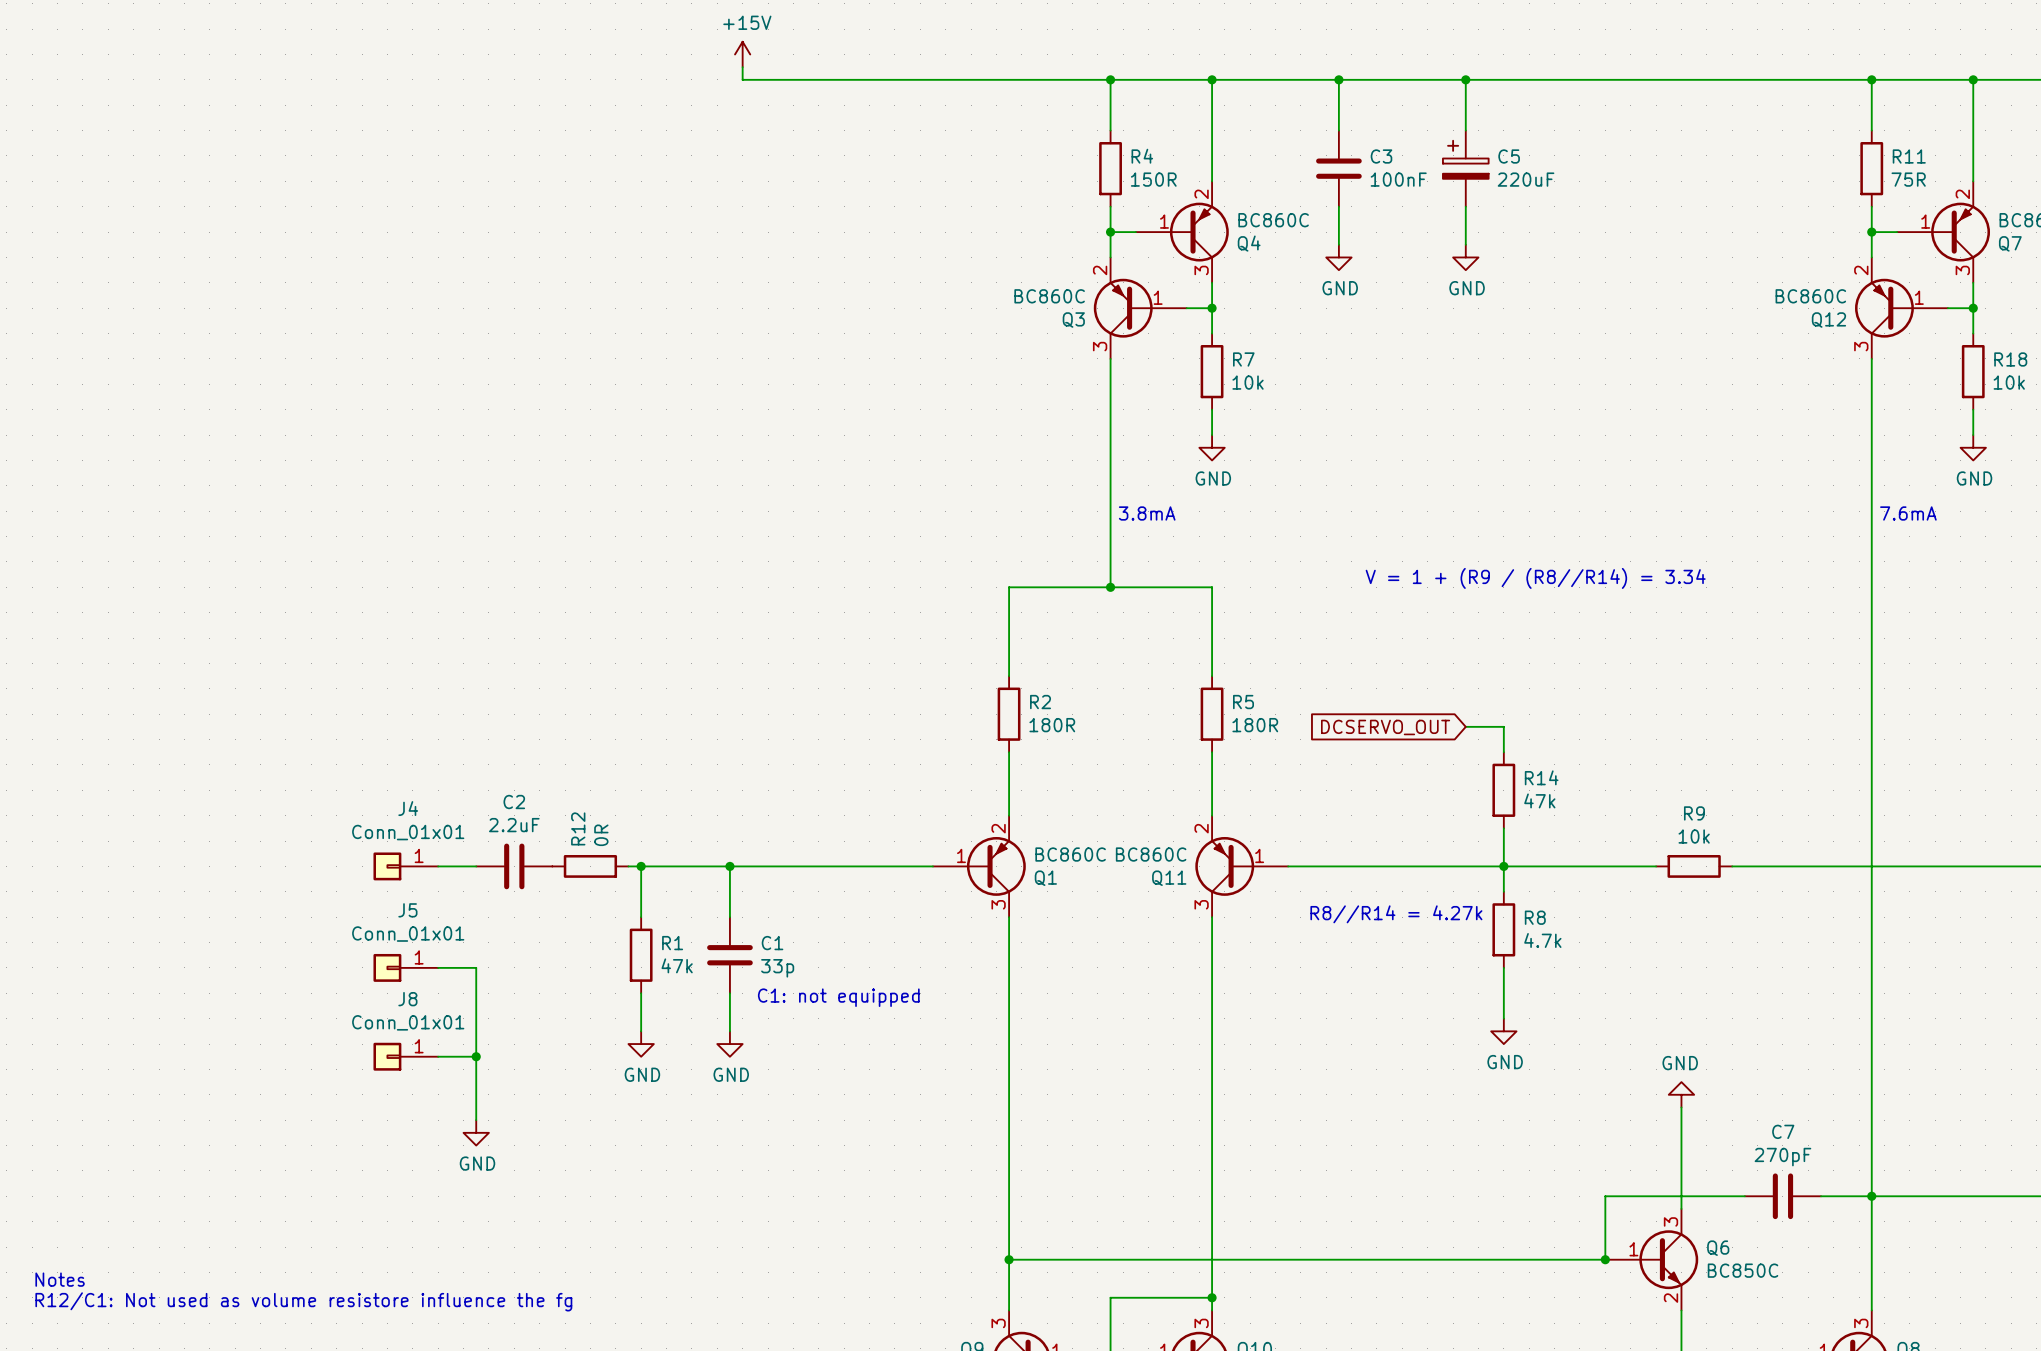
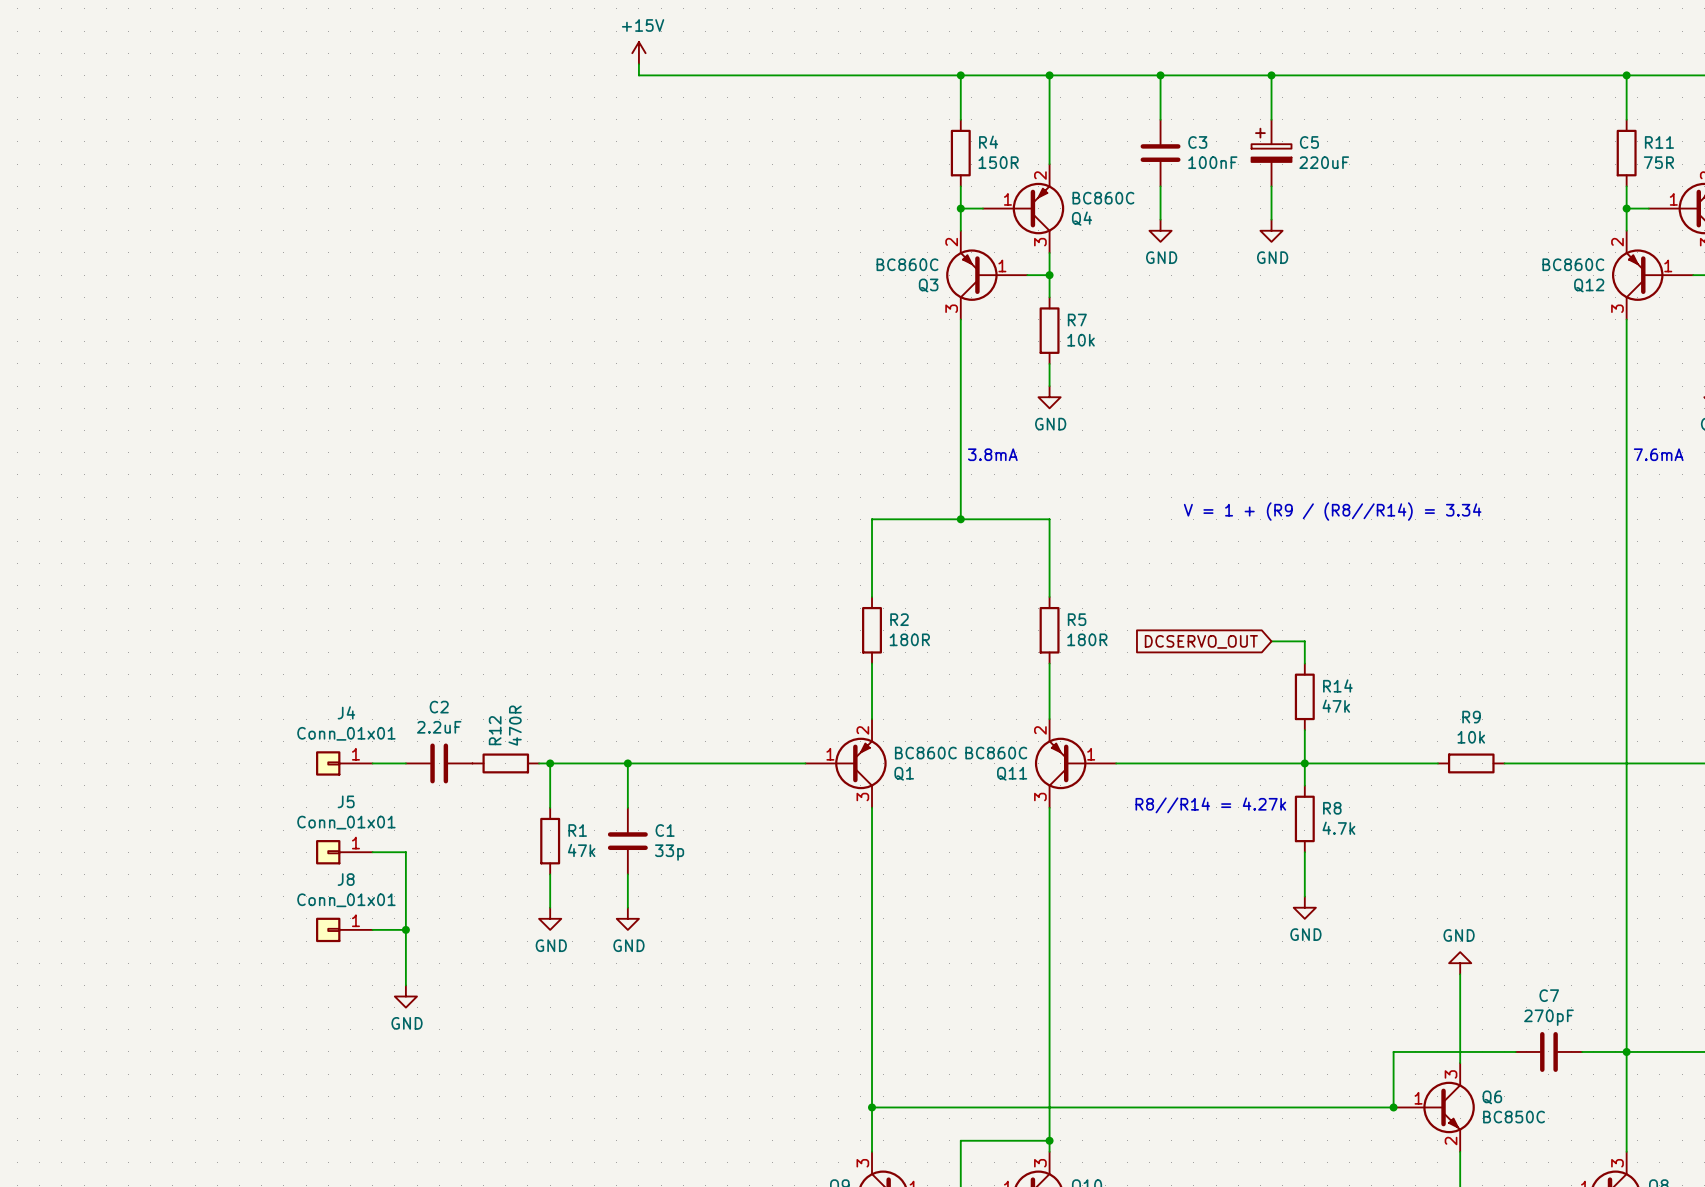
R12 value: 0R (601, 835) -> 470R (515, 725)
text: C1: not equipped (838, 997) -> none
text: Notes (60, 1279) -> none
text: R12/C1: Not used as volume resistore influence the fg (303, 1301) -> none

